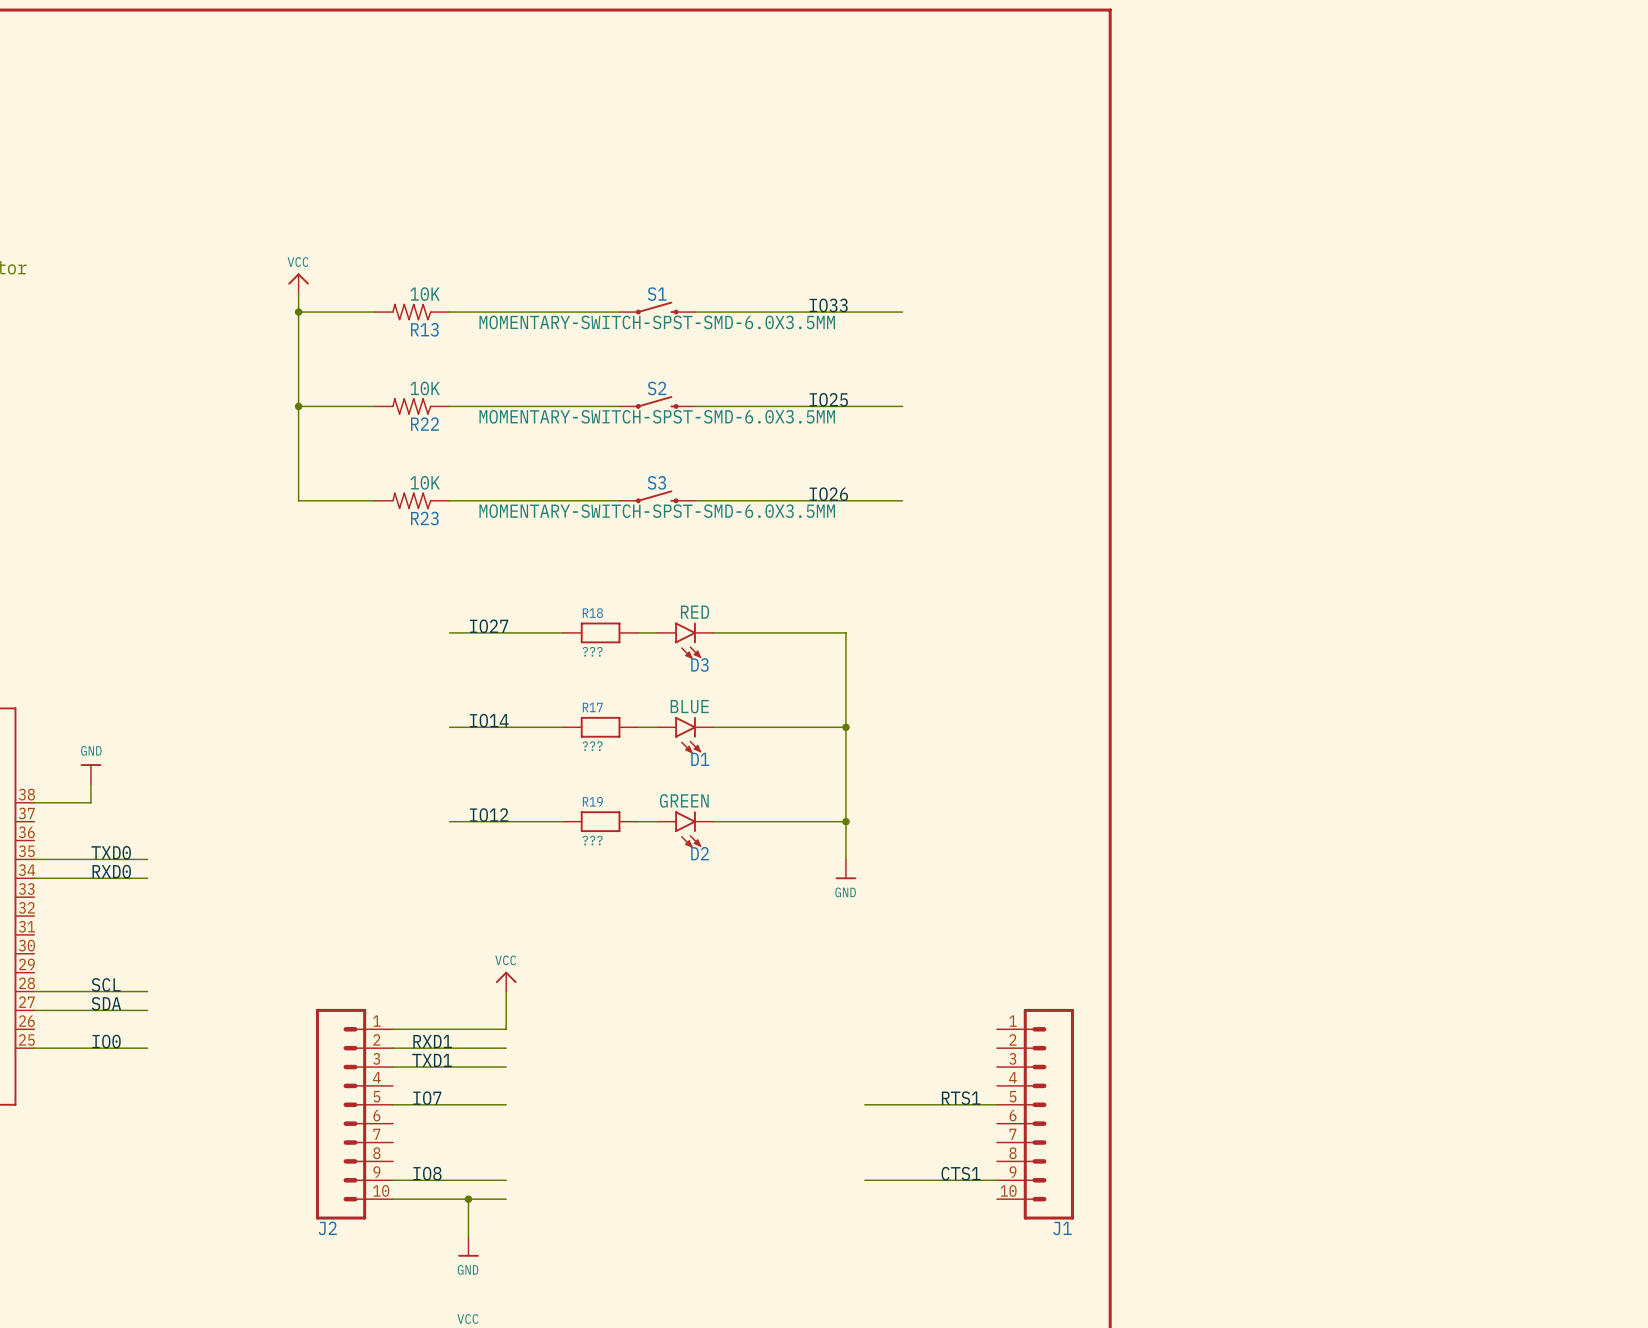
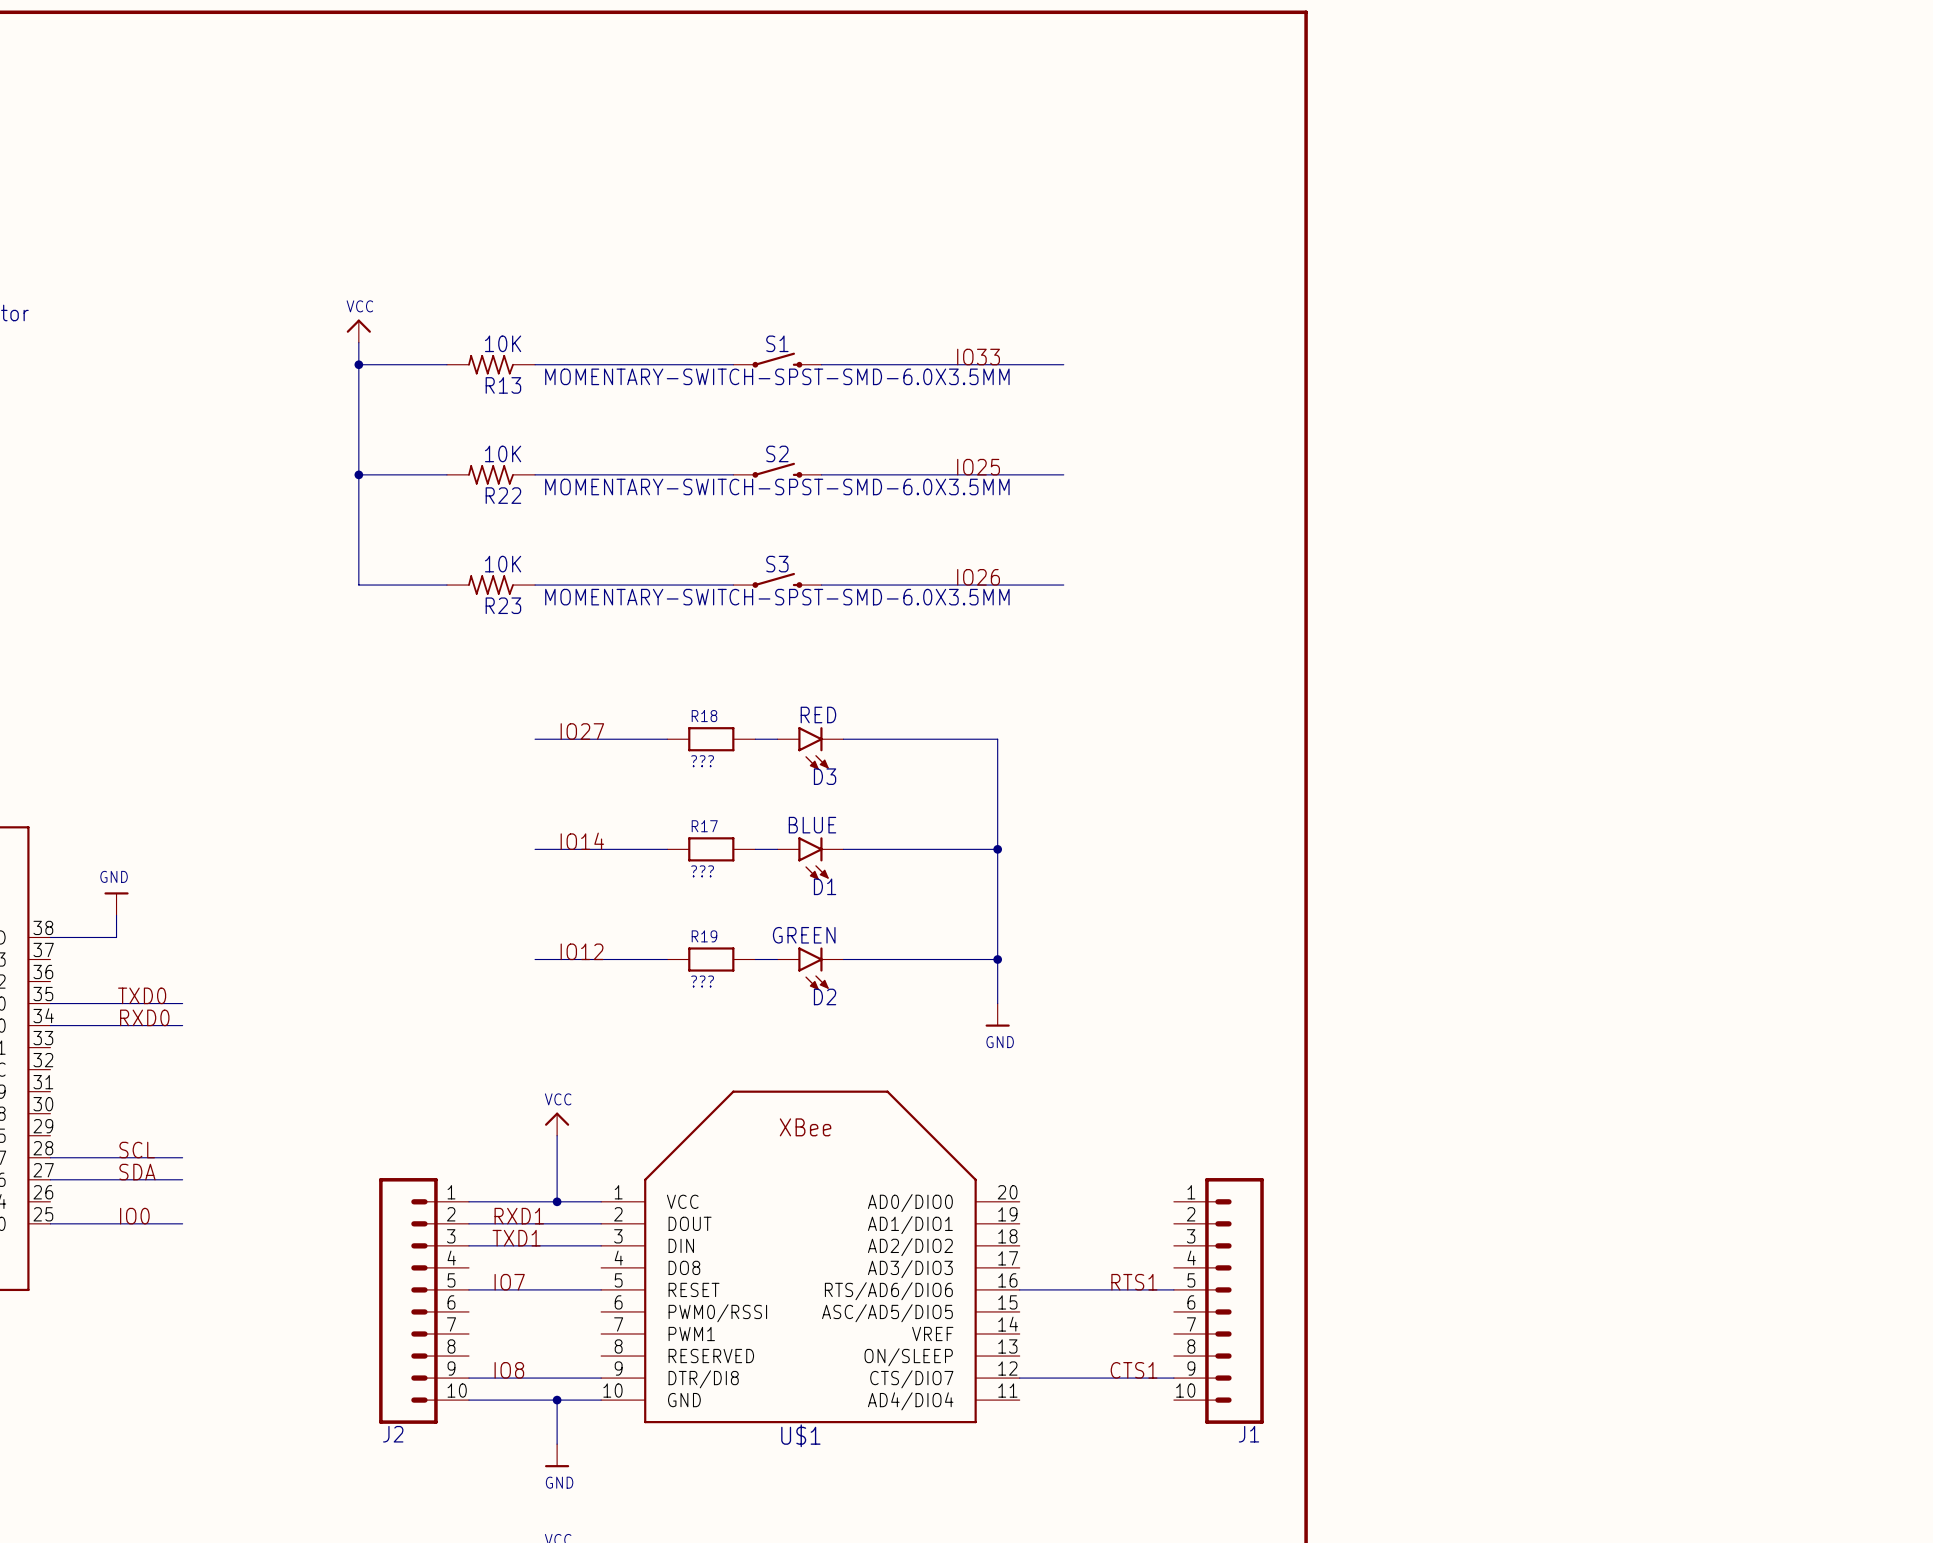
wire: none -> (557, 1135) (557, 1201)
power symbol position: VCC (506, 981) -> VCC (557, 1124)
wire: (506, 991) (506, 1029) -> none
junction: none -> (557, 1201)
U$1: none -> (810, 1256)

